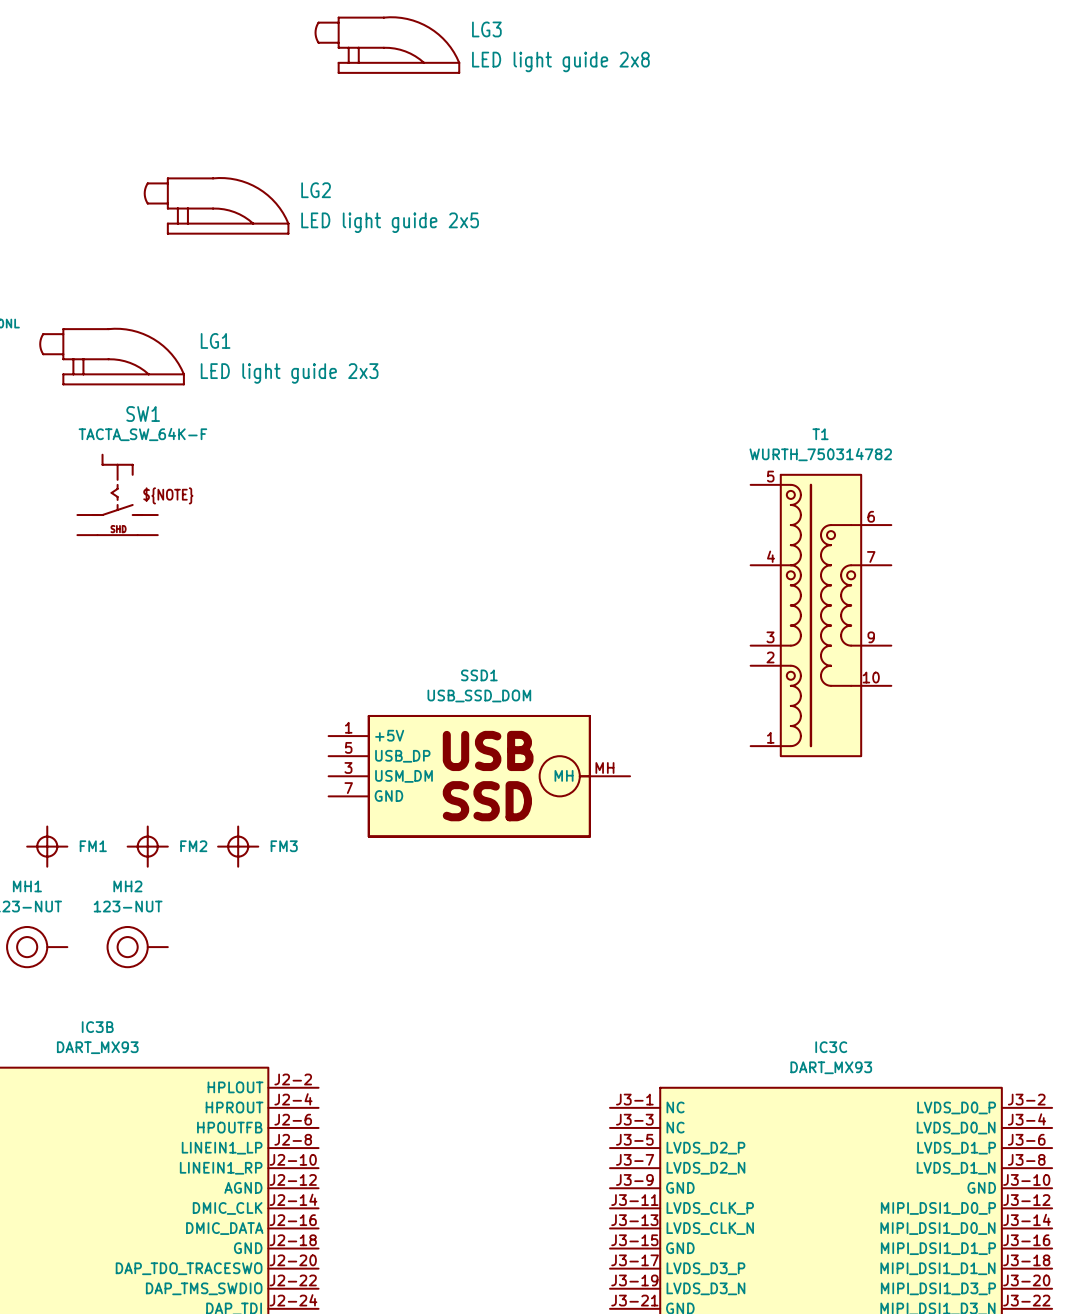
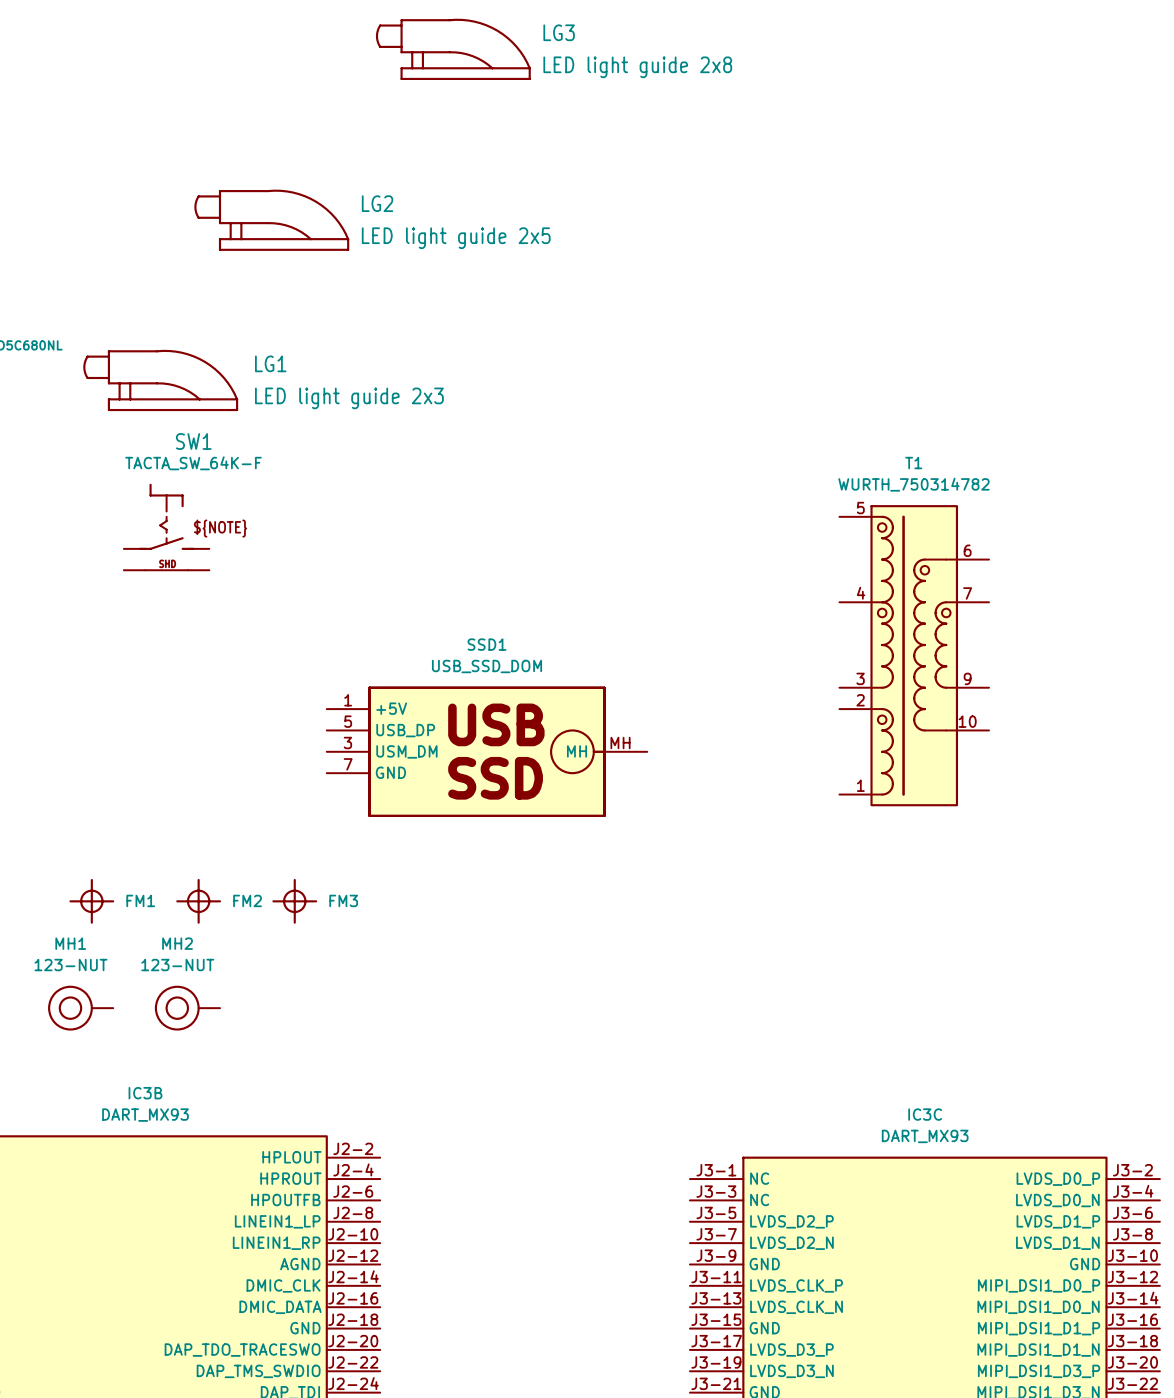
SSD1 position: (479, 776) -> (487, 751)

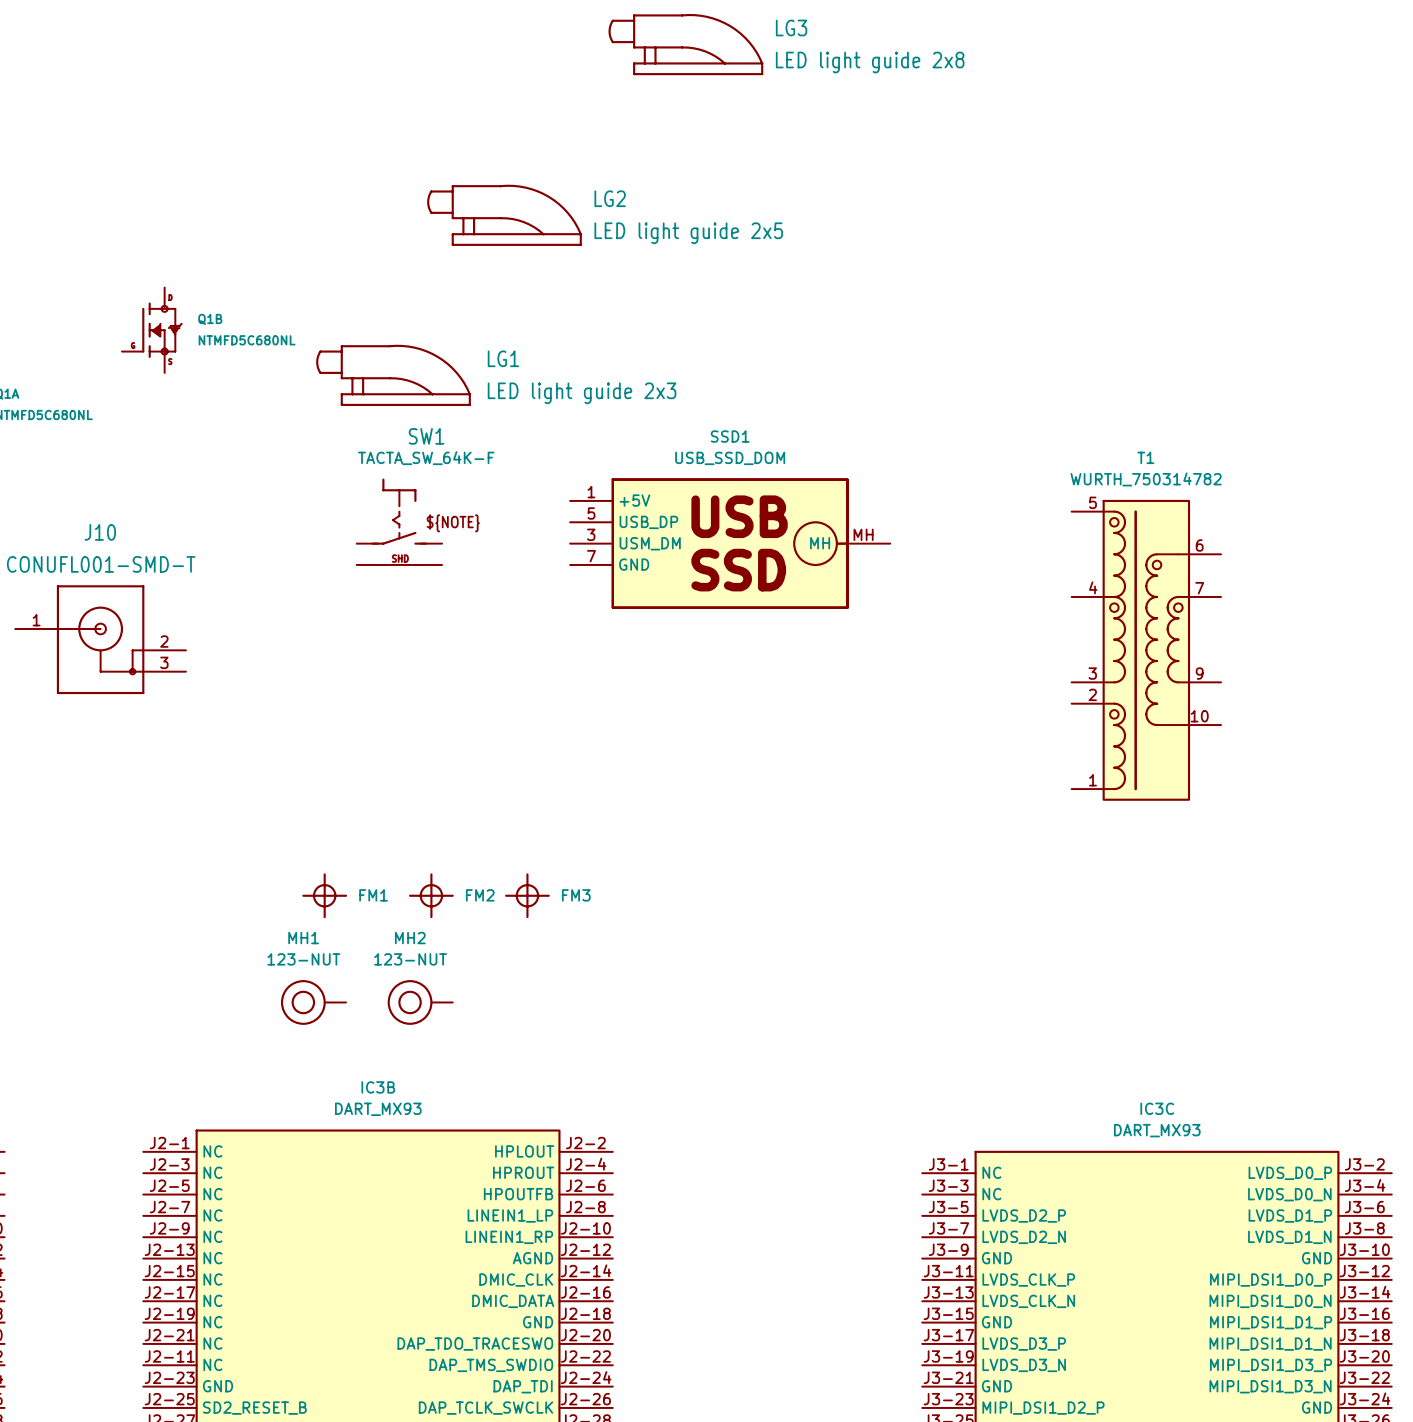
SSD1 position: (487, 751) -> (730, 543)

